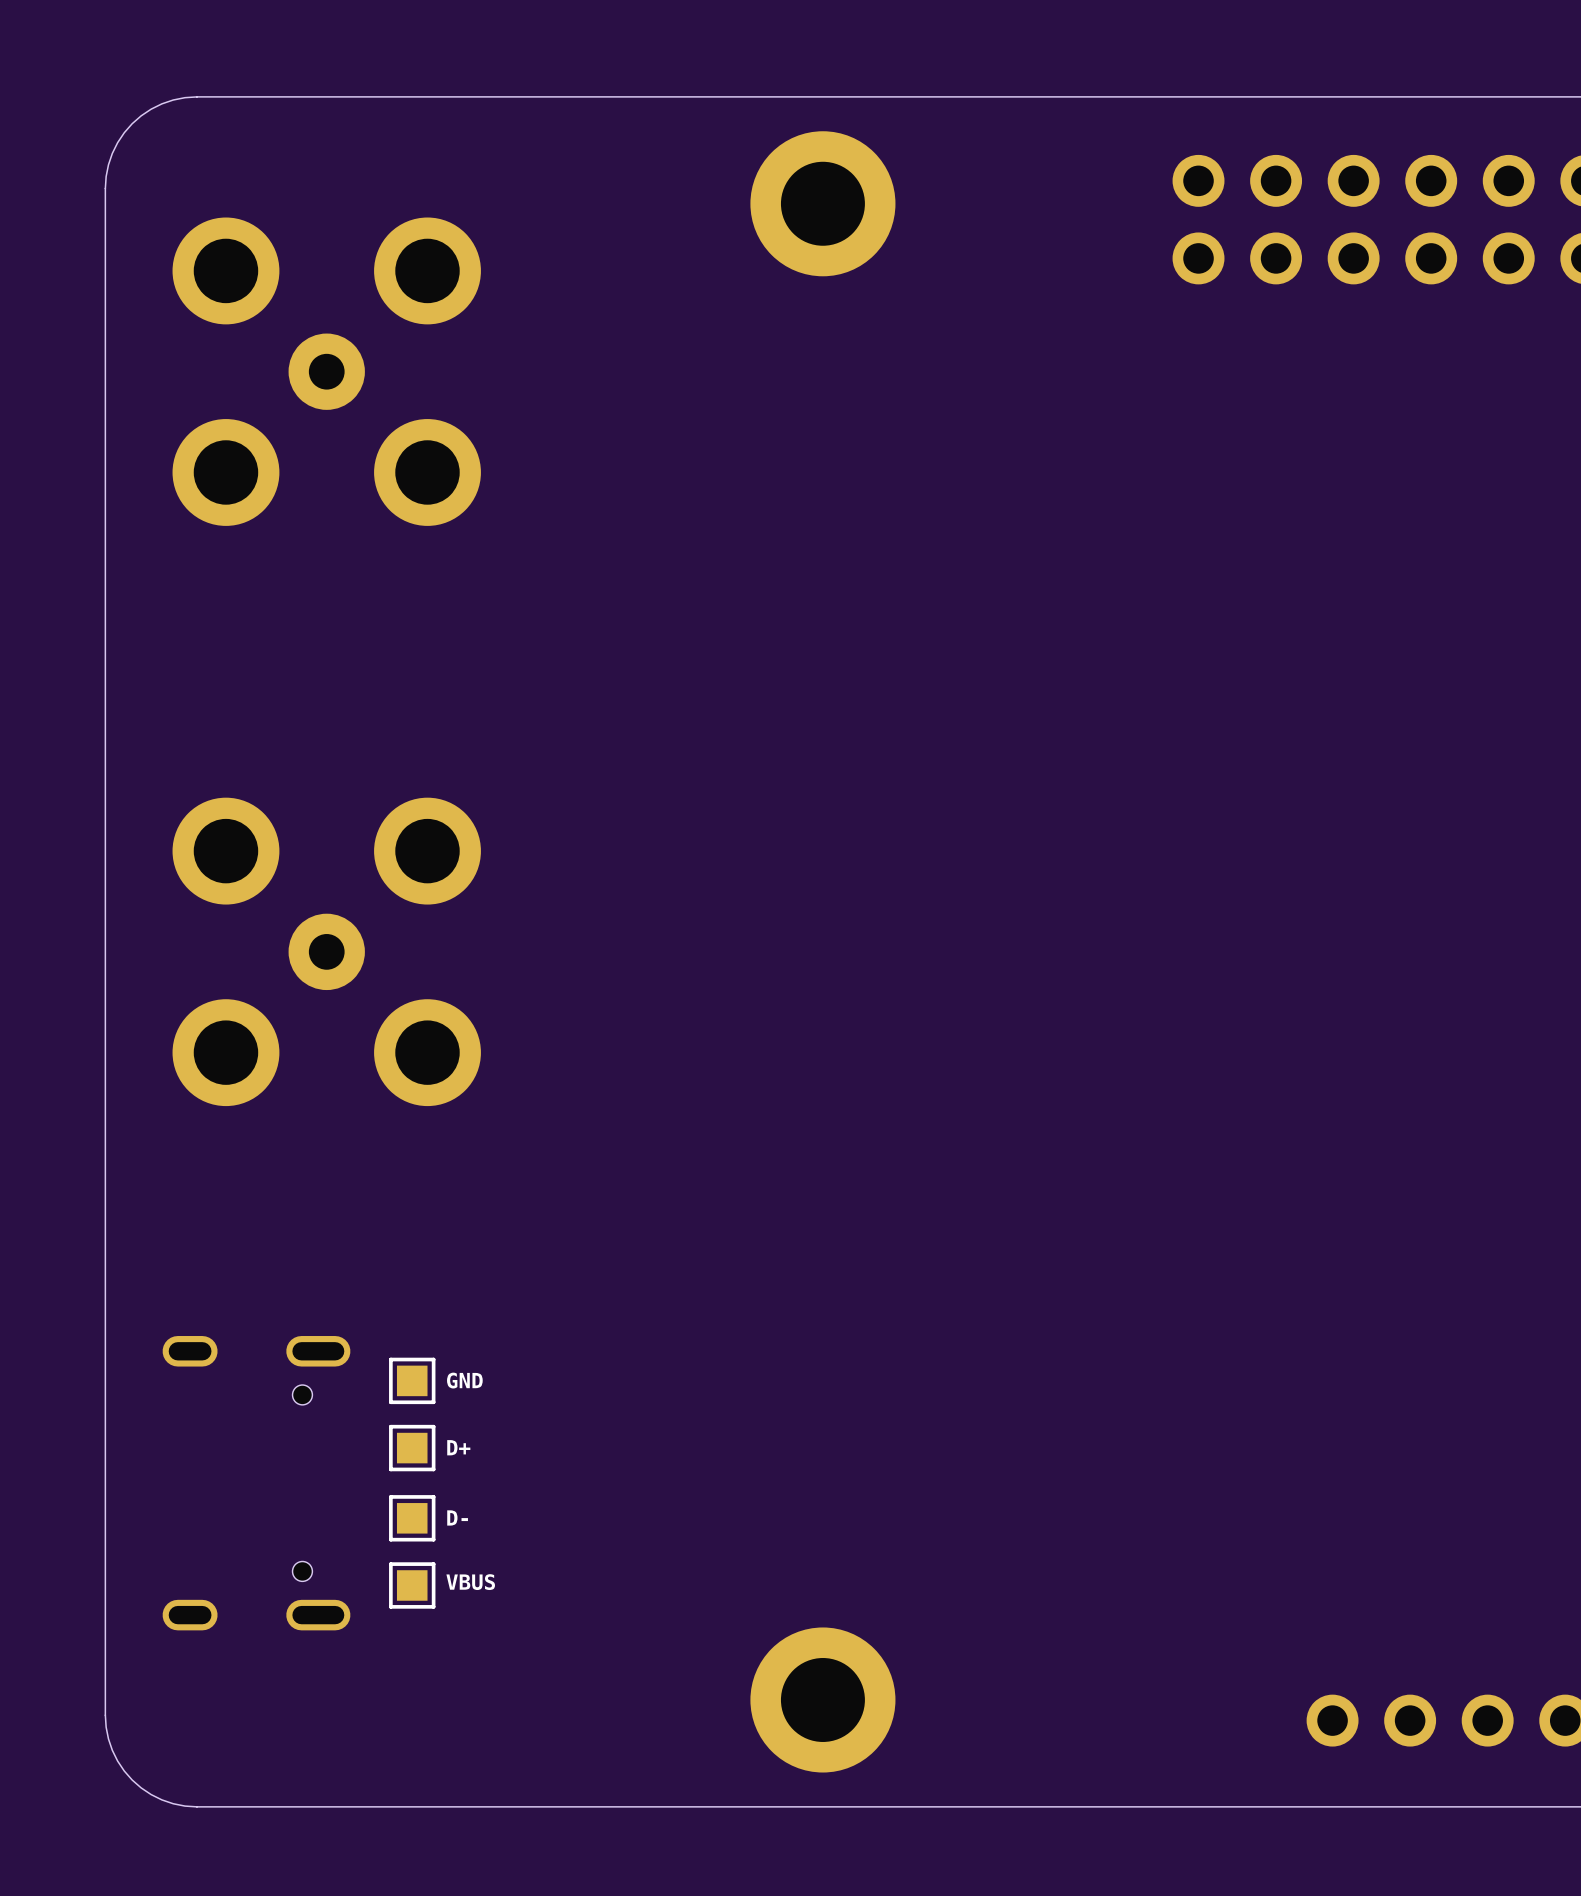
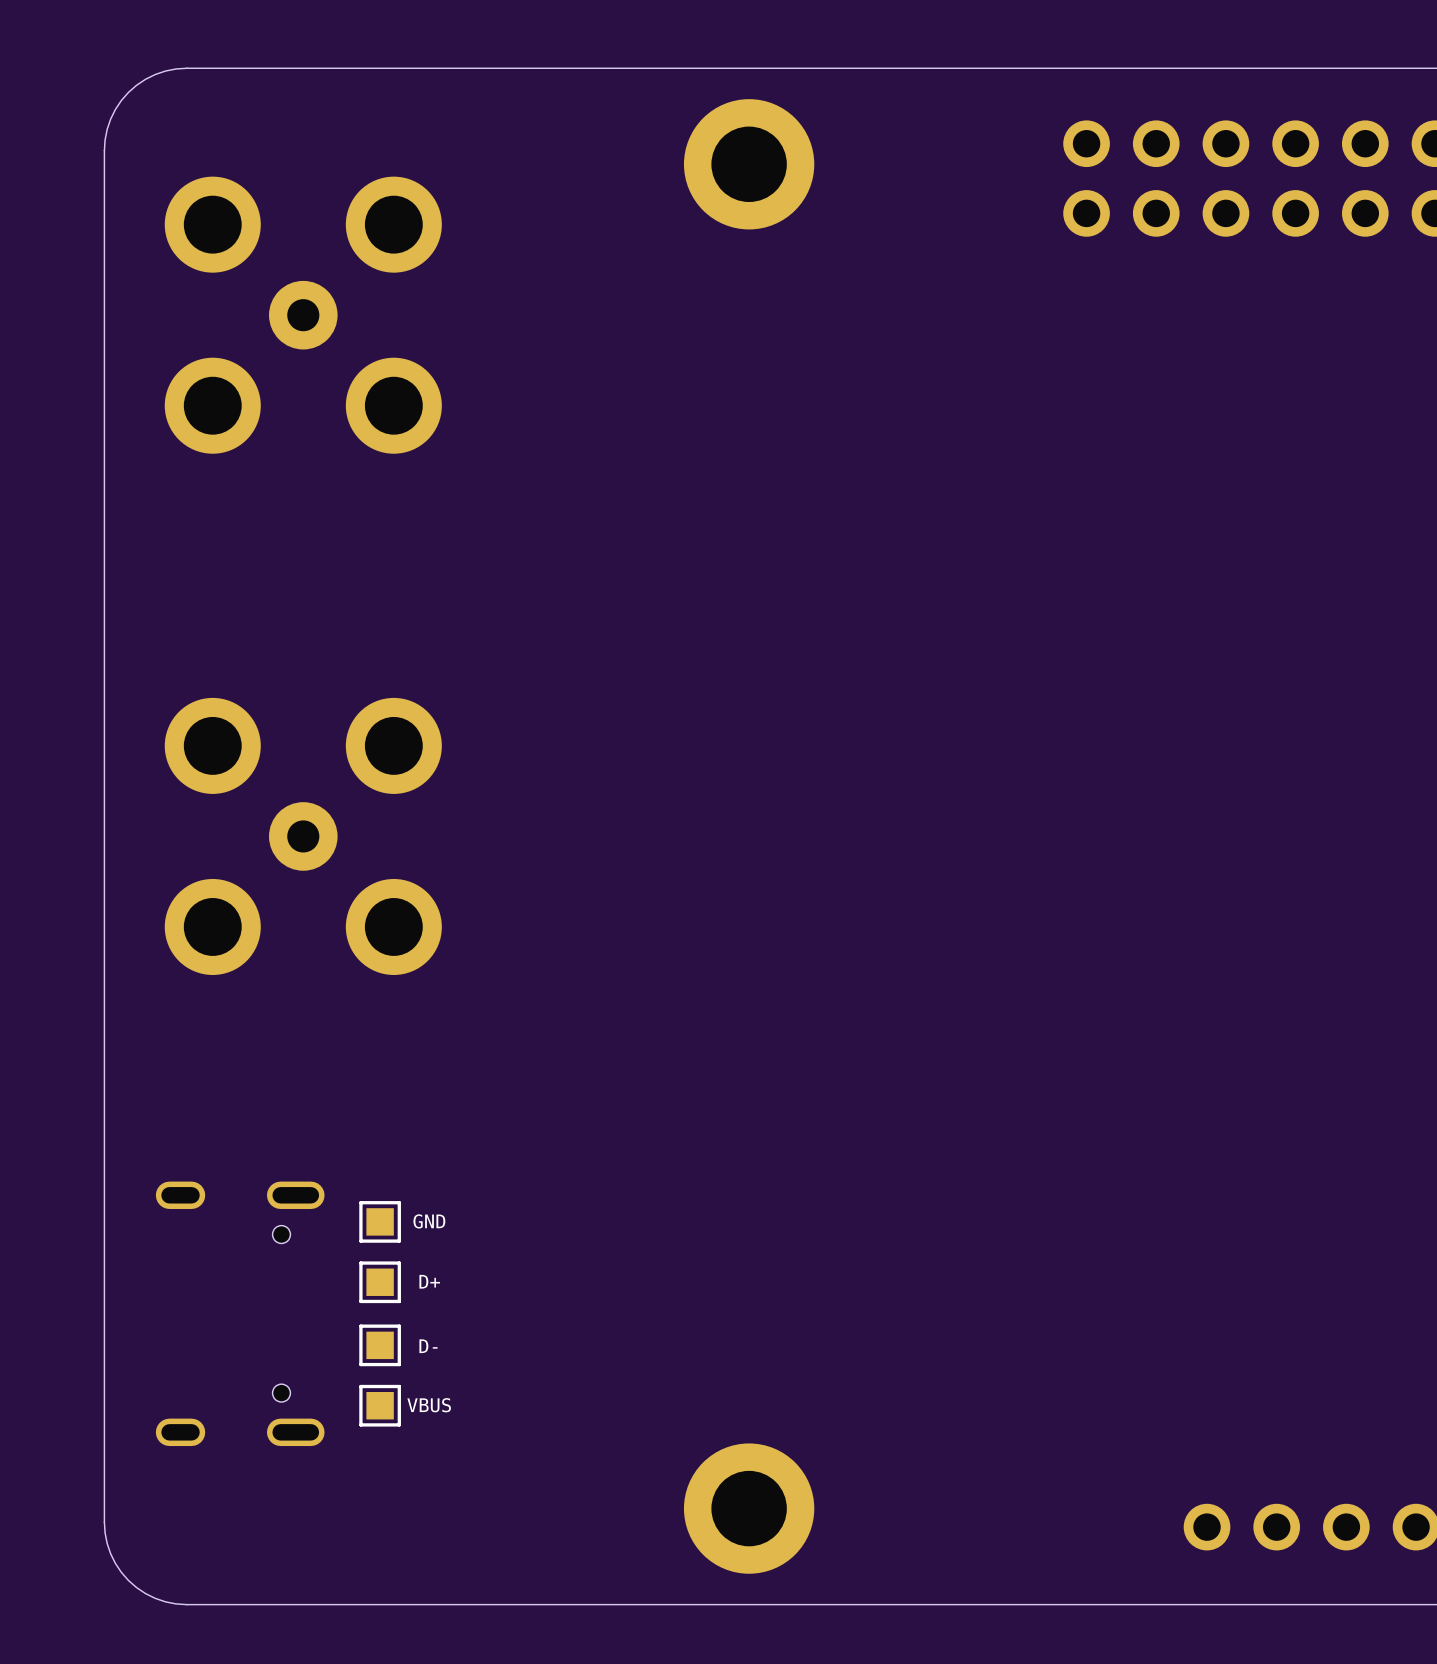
text: GND (464, 1380) -> none
GND name: none -> GND (429, 1221)
text: D+ (458, 1447) -> none
D+ name: none -> D+ (429, 1281)
text: D- (457, 1517) -> none
D- name: none -> D- (428, 1346)
text: VBUS (470, 1582) -> none
VBUS name: none -> VBUS (429, 1405)

